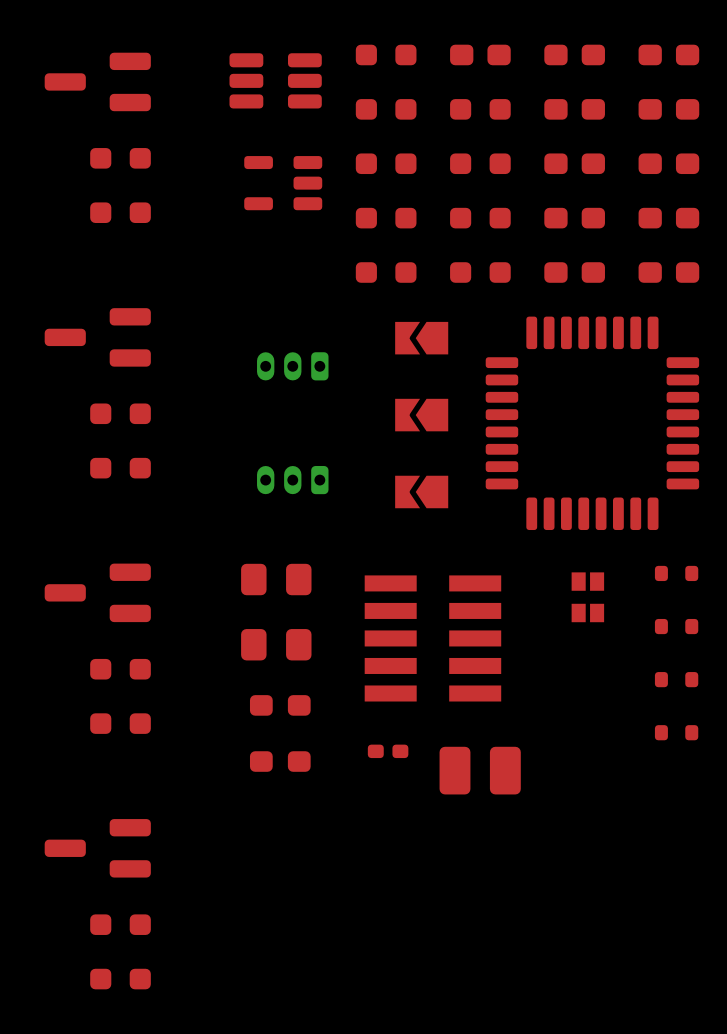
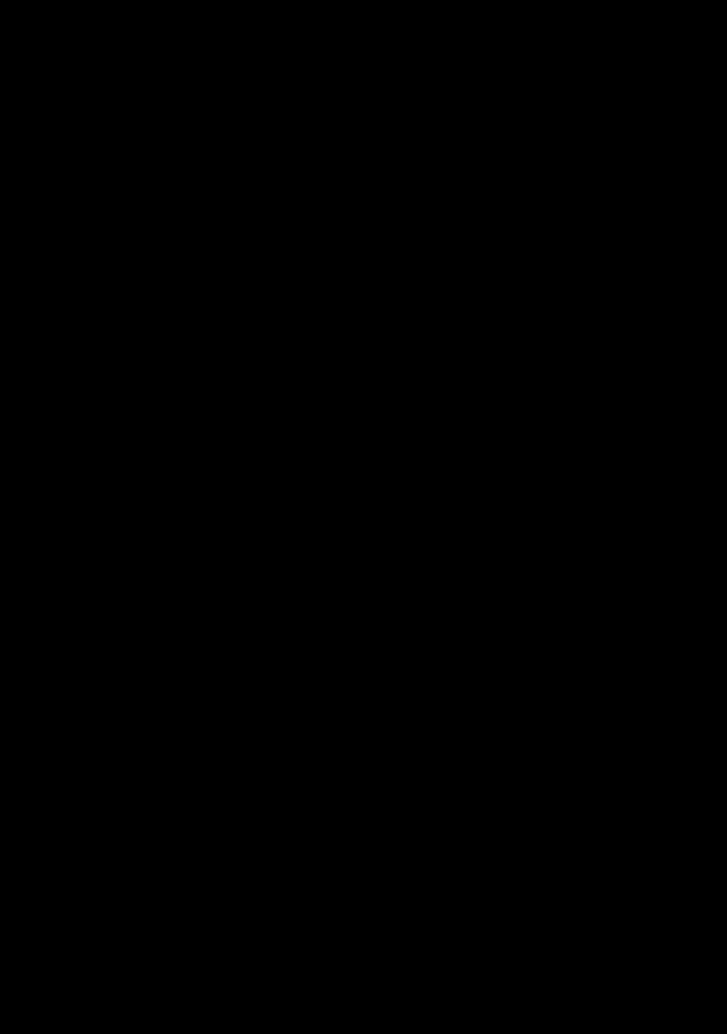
part: (386, 54) -> none
part: (480, 54) -> none
part: (574, 54) -> none
part: (668, 54) -> none
part: (275, 80) -> none
part: (97, 81) -> none
part: (386, 109) -> none
part: (480, 109) -> none
part: (574, 109) -> none
part: (668, 109) -> none
part: (120, 158) -> none
part: (386, 163) -> none
part: (480, 163) -> none
part: (574, 163) -> none
part: (668, 163) -> none
part: (283, 183) -> none
part: (120, 212) -> none
part: (386, 218) -> none
part: (480, 218) -> none
part: (574, 218) -> none
part: (668, 218) -> none
part: (386, 272) -> none
part: (480, 272) -> none
part: (574, 272) -> none
part: (668, 272) -> none
part: (97, 337) -> none
part: (421, 338) -> none
part: (292, 366) -> none
part: (120, 413) -> none
part: (421, 415) -> none
part: (592, 423) -> none
part: (120, 468) -> none
part: (292, 480) -> none
part: (421, 491) -> none
part: (676, 573) -> none
part: (276, 579) -> none
part: (97, 592) -> none
part: (587, 597) -> none
part: (676, 626) -> none
part: (432, 638) -> none
part: (276, 644) -> none
part: (120, 669) -> none
part: (676, 679) -> none
part: (280, 705) -> none
part: (120, 723) -> none
part: (676, 732) -> none
part: (388, 751) -> none
part: (280, 761) -> none
part: (480, 770) -> none
part: (97, 848) -> none
part: (120, 924) -> none
part: (120, 979) -> none

